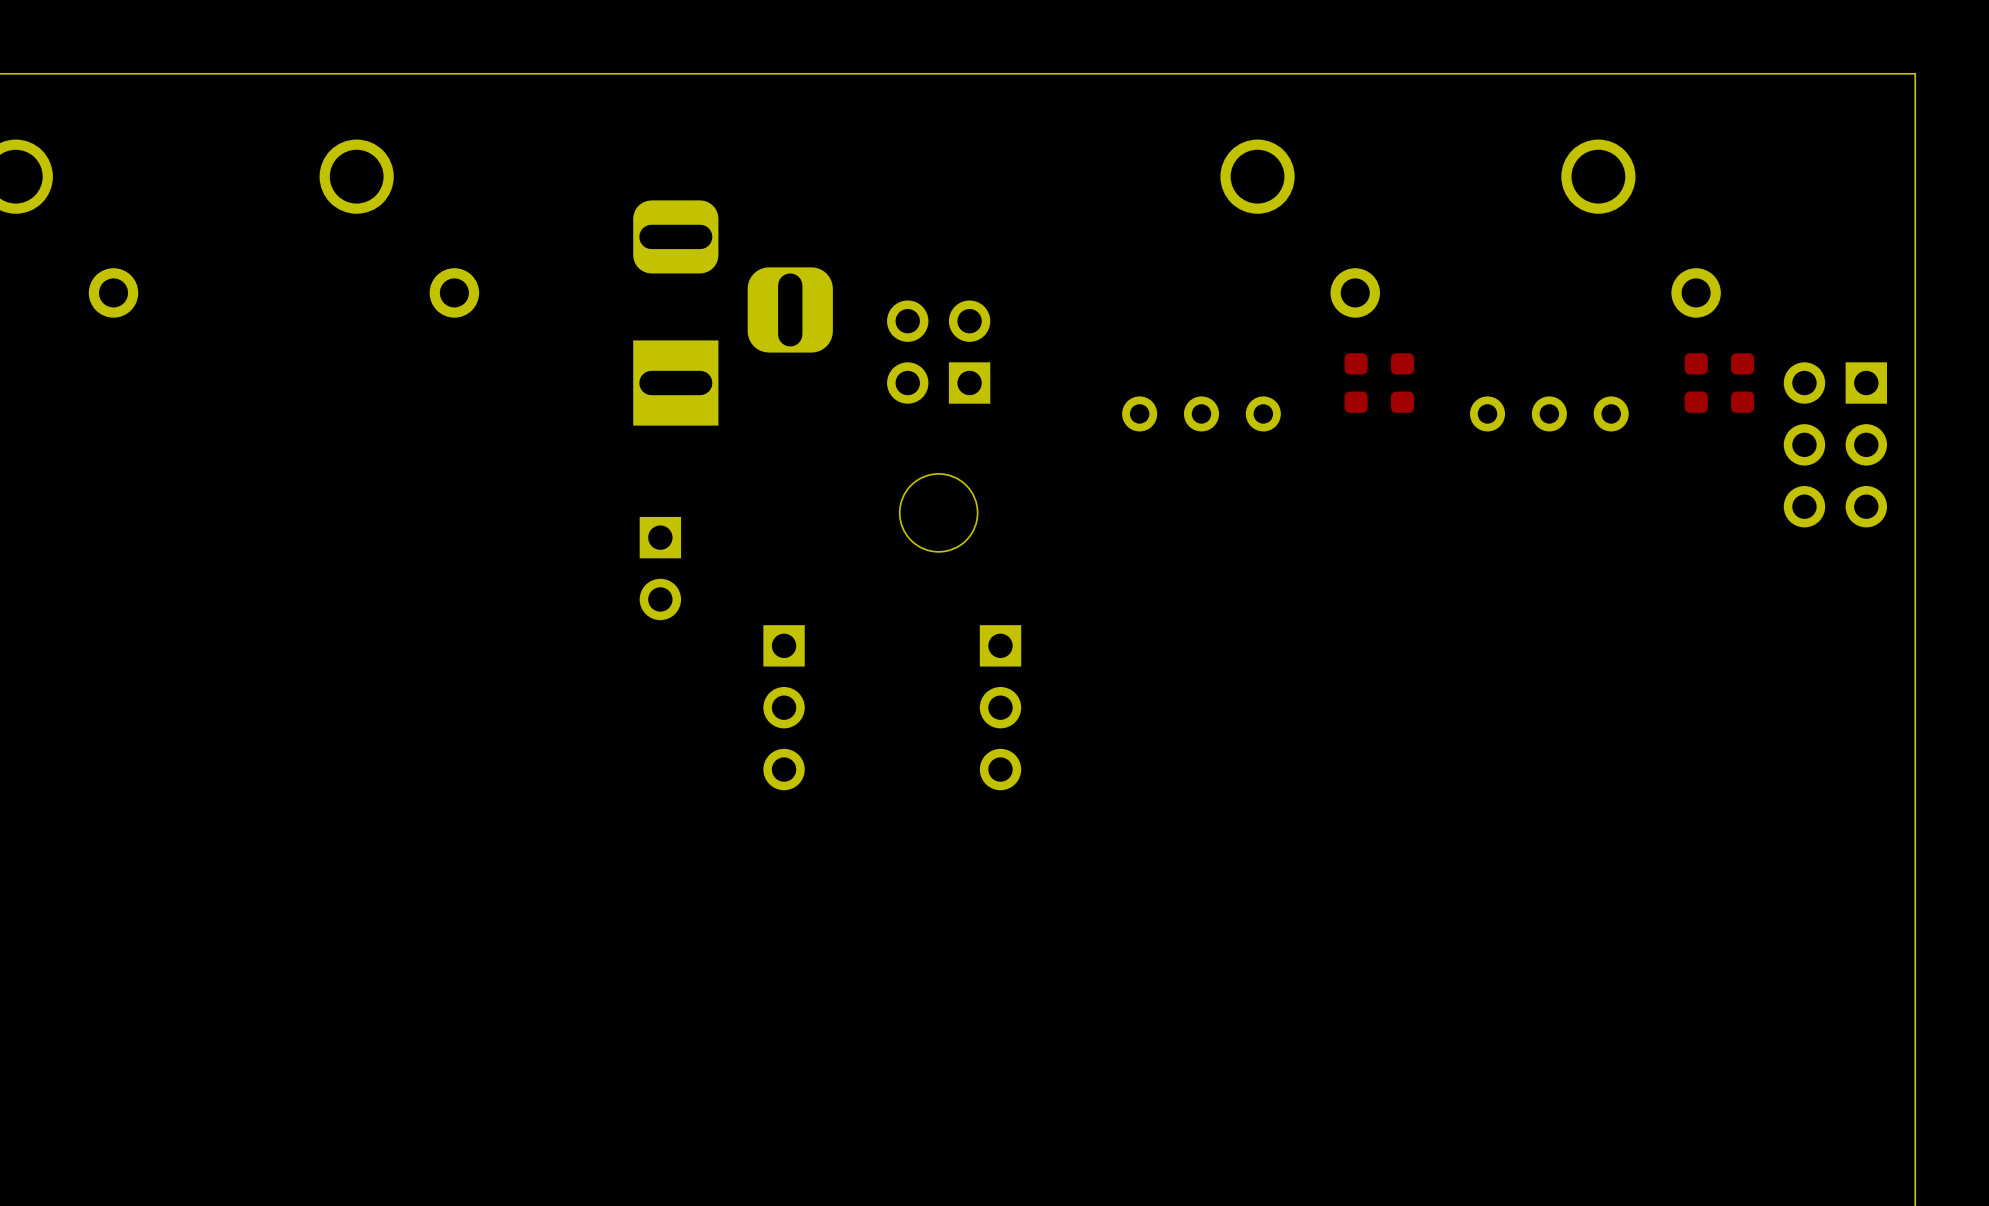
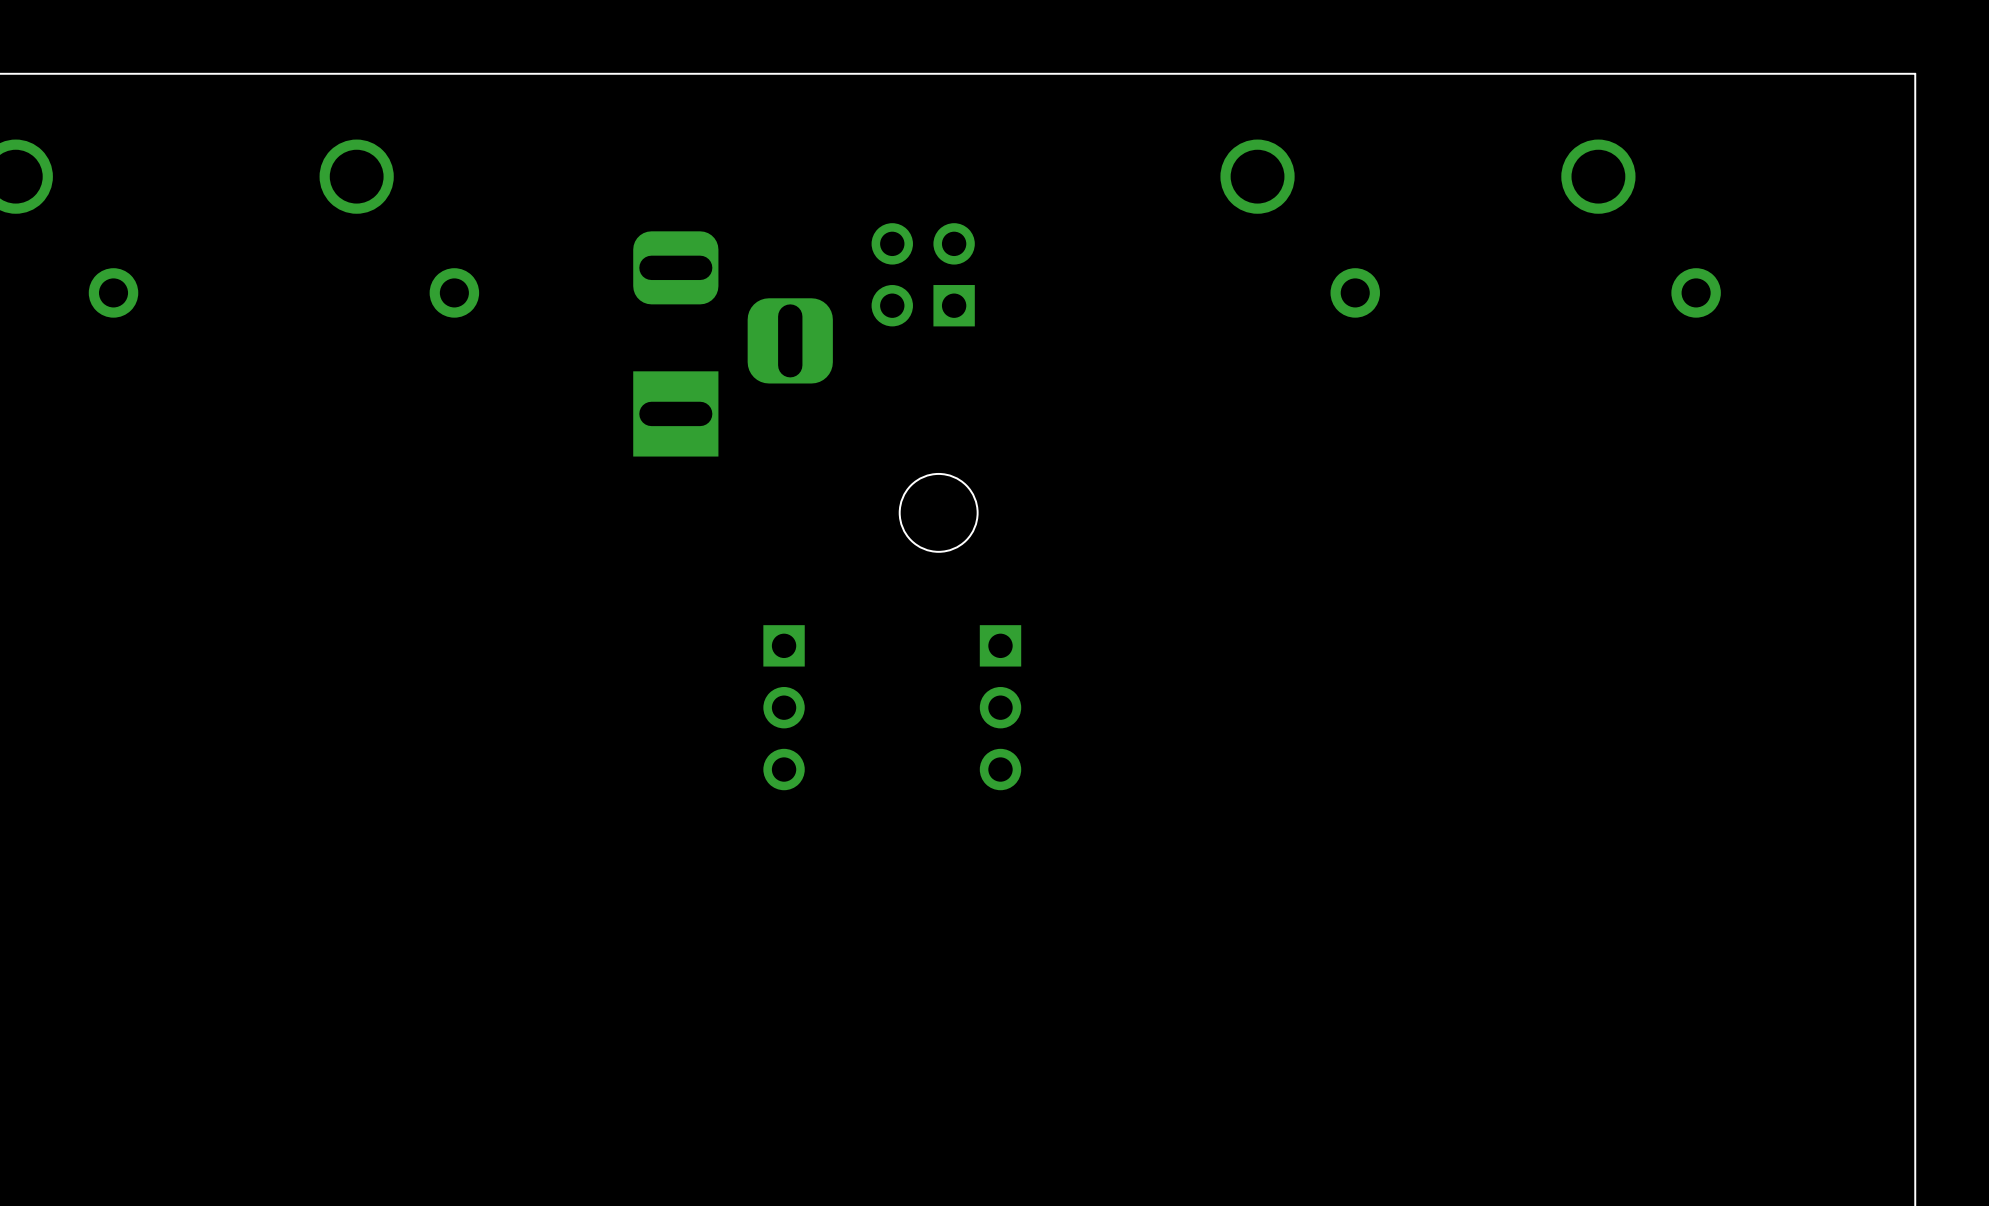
part position: (733, 313) -> (733, 343)
part position: (938, 352) -> (923, 274)
part: (1356, 383) -> none
part: (1402, 383) -> none
part: (1696, 383) -> none
part: (1742, 383) -> none
part: (1201, 413) -> none
part: (1549, 413) -> none
part: (1835, 444) -> none
part: (660, 568) -> none

